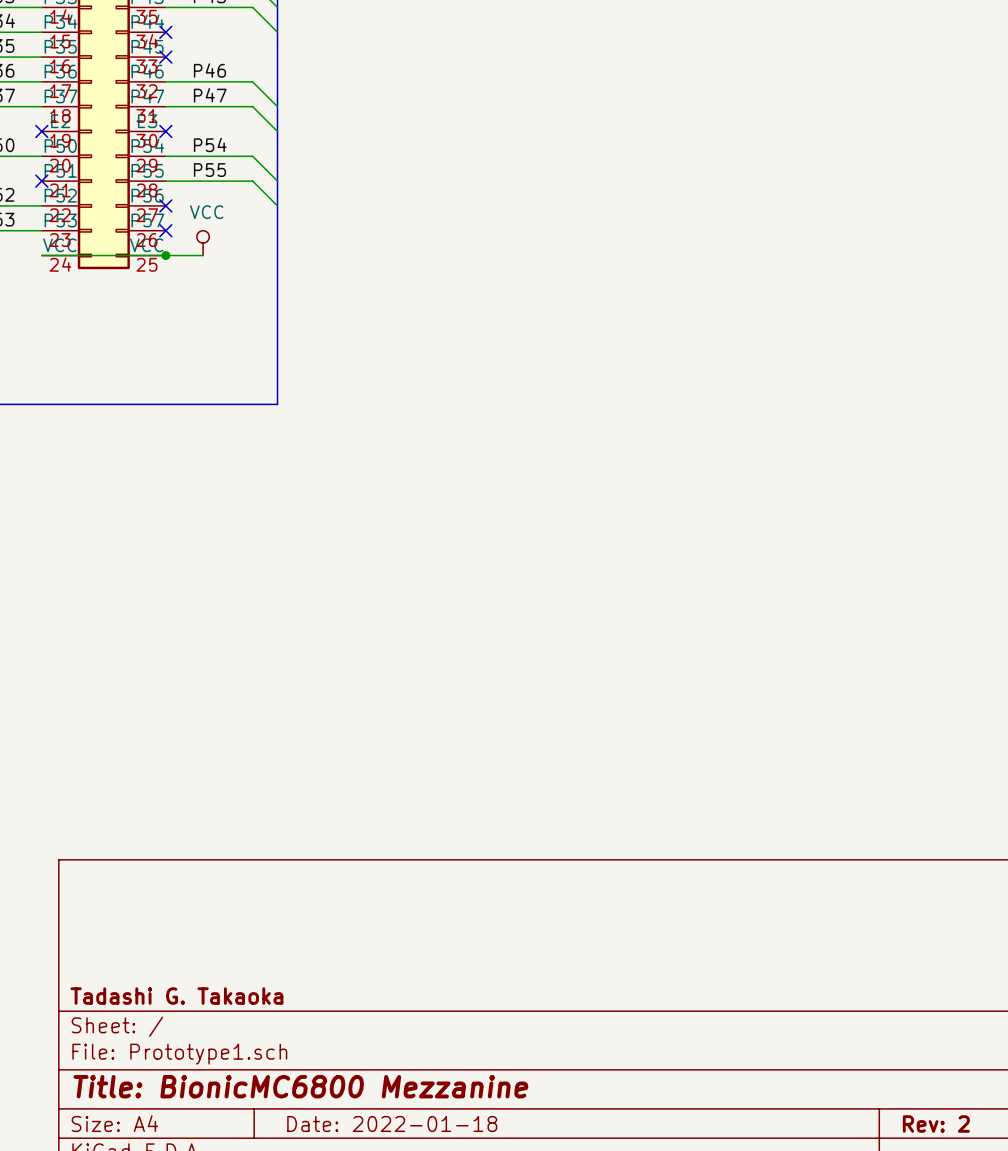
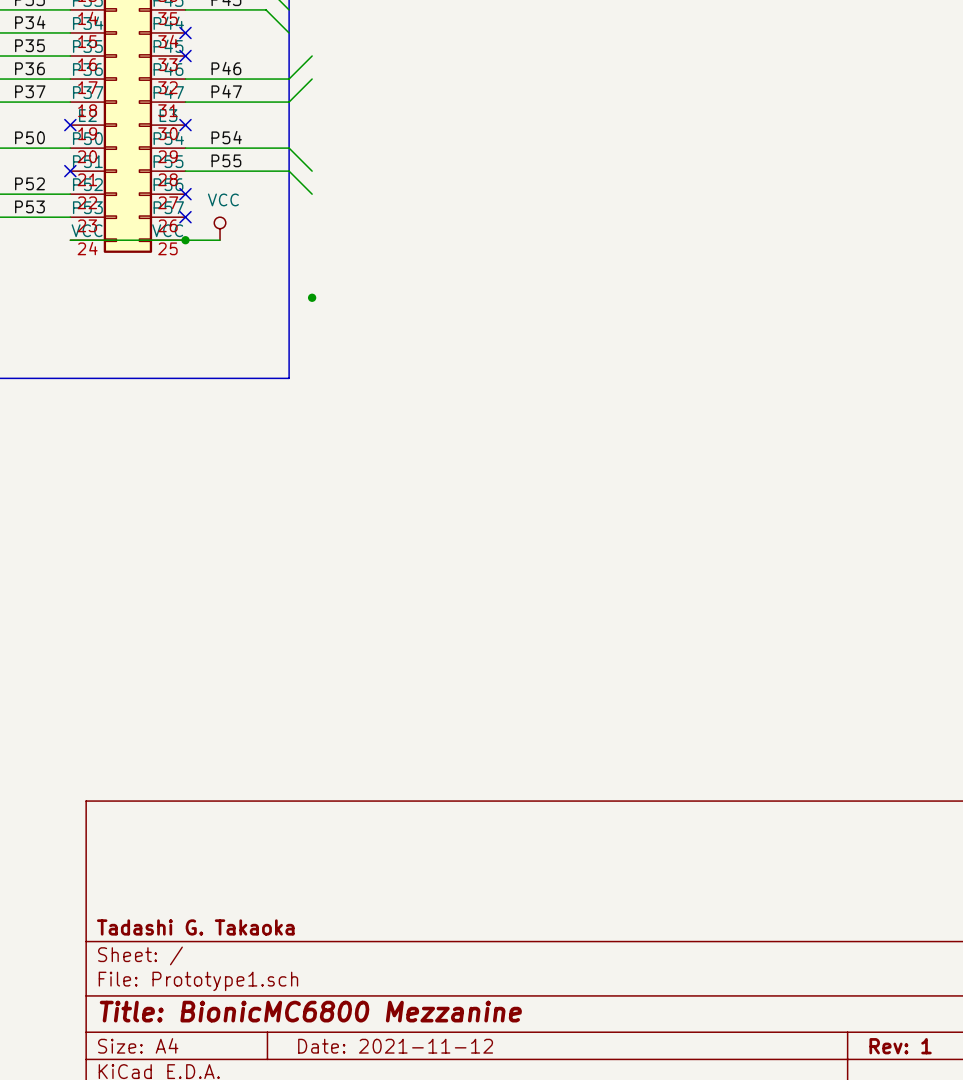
wire: (252, 81) (277, 106) -> (266, 79) (289, 79) (312, 56)
wire: (252, 106) (277, 131) -> (266, 102) (289, 102) (312, 79)
wire: (252, 156) (277, 181) -> (266, 148) (289, 148) (312, 171)
wire: (252, 181) (277, 205) -> (266, 171) (289, 171) (312, 194)
junction: none -> (312, 297)
title block: Date: 2022-01-18 (392, 1123) -> Date: 2021-11-12 (395, 1046)
title block: Rev: 2 (936, 1123) -> Rev: 1 (900, 1046)

